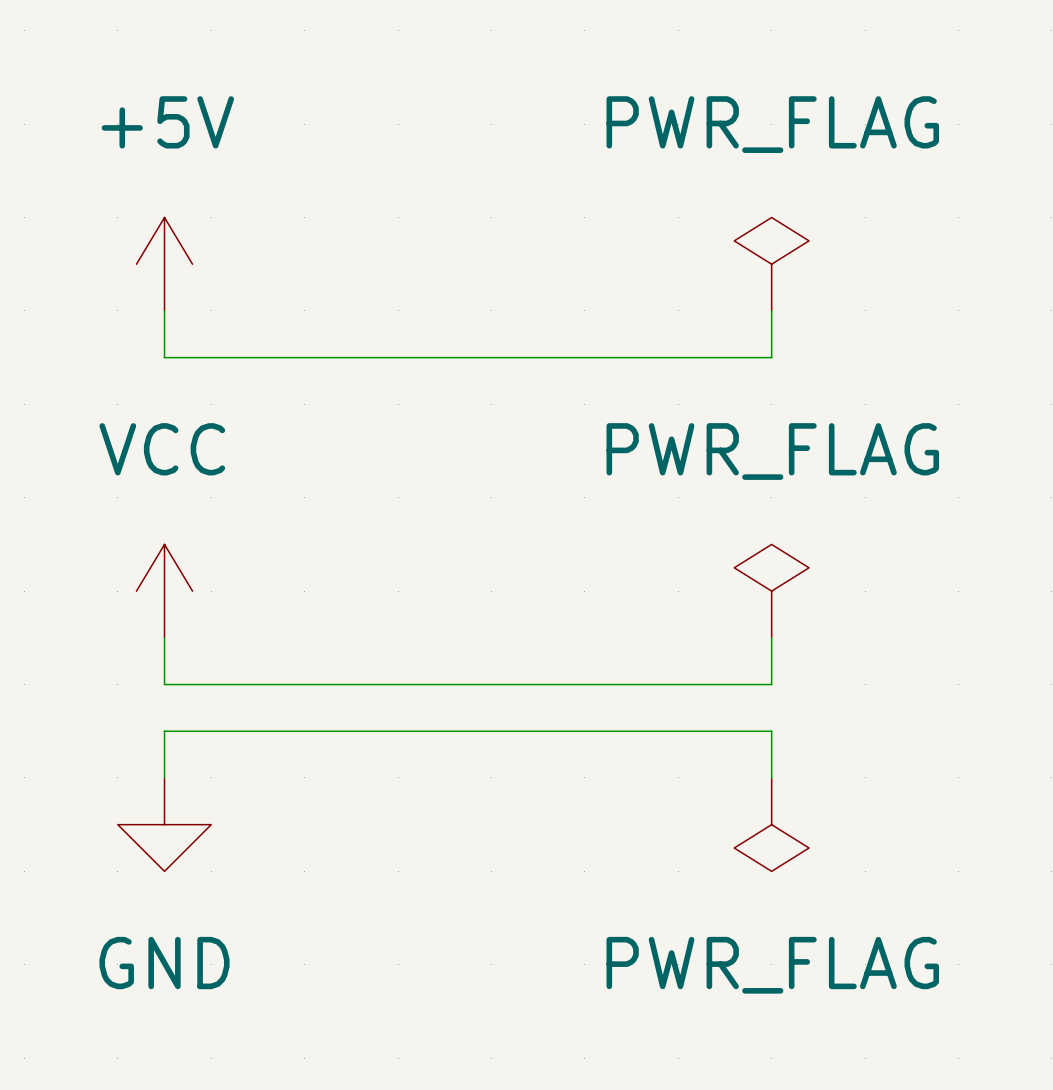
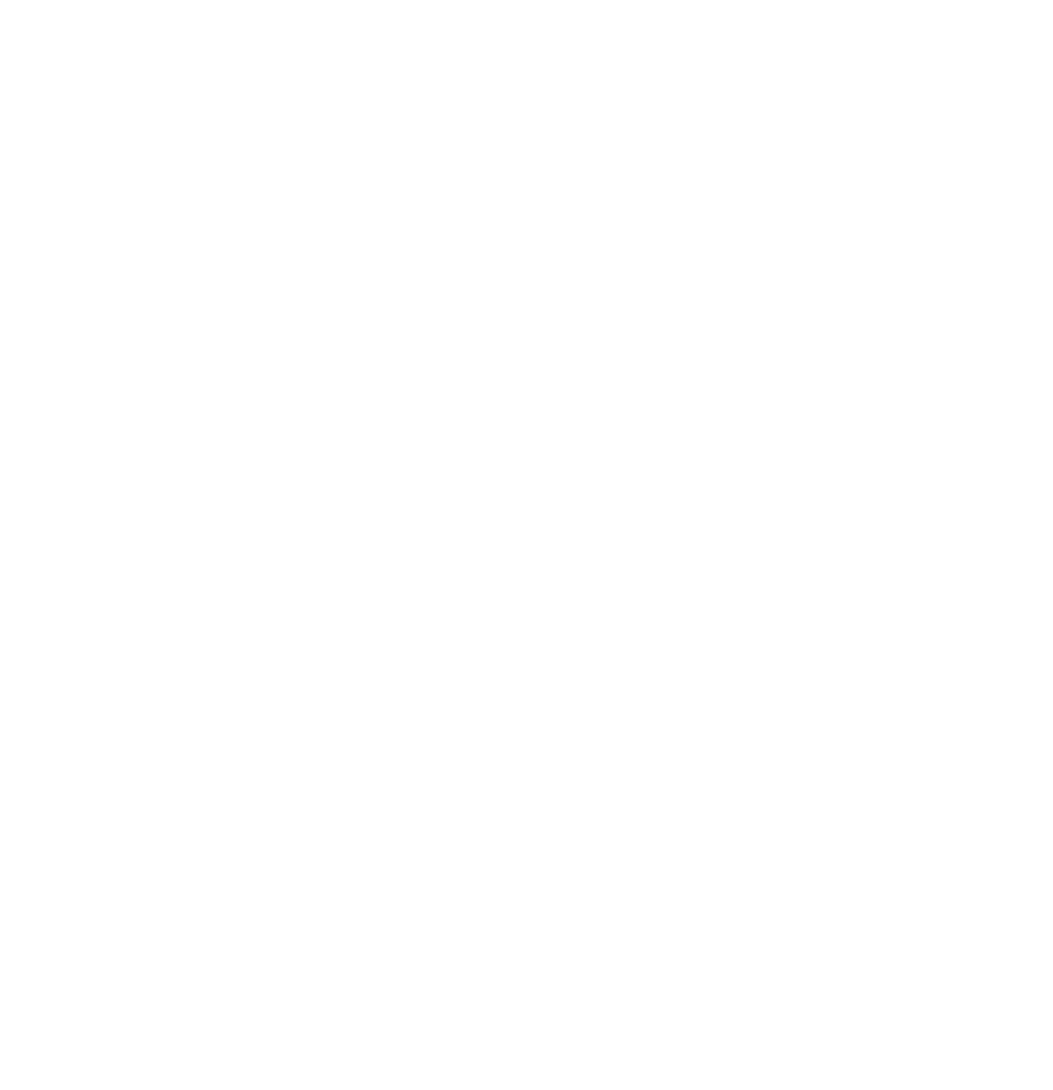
power symbol: +5V (164, 264) -> none
power symbol: PWR_FLAG (771, 264) -> none
wire: (164, 310) (164, 357) (771, 357) (771, 310) -> none
power symbol: VCC (164, 591) -> none
power symbol: PWR_FLAG (771, 591) -> none
wire: (164, 637) (164, 684) (771, 684) (771, 637) -> none
wire: (164, 777) (164, 731) (771, 731) (771, 777) -> none
power symbol: GND (164, 824) -> none
power symbol: PWR_FLAG (771, 824) -> none

